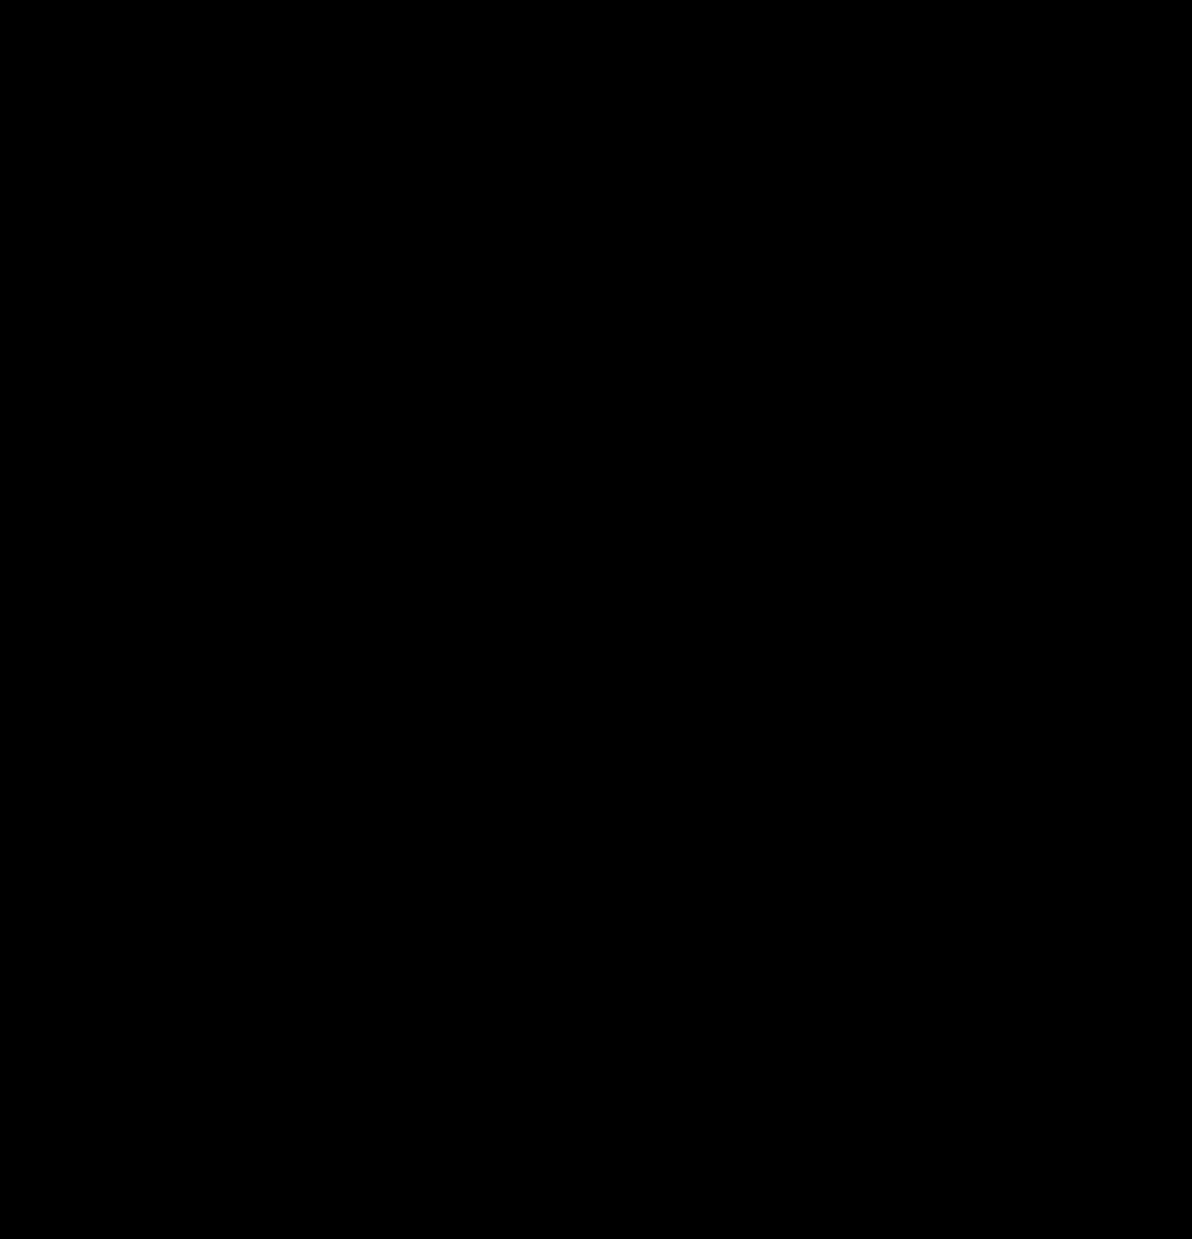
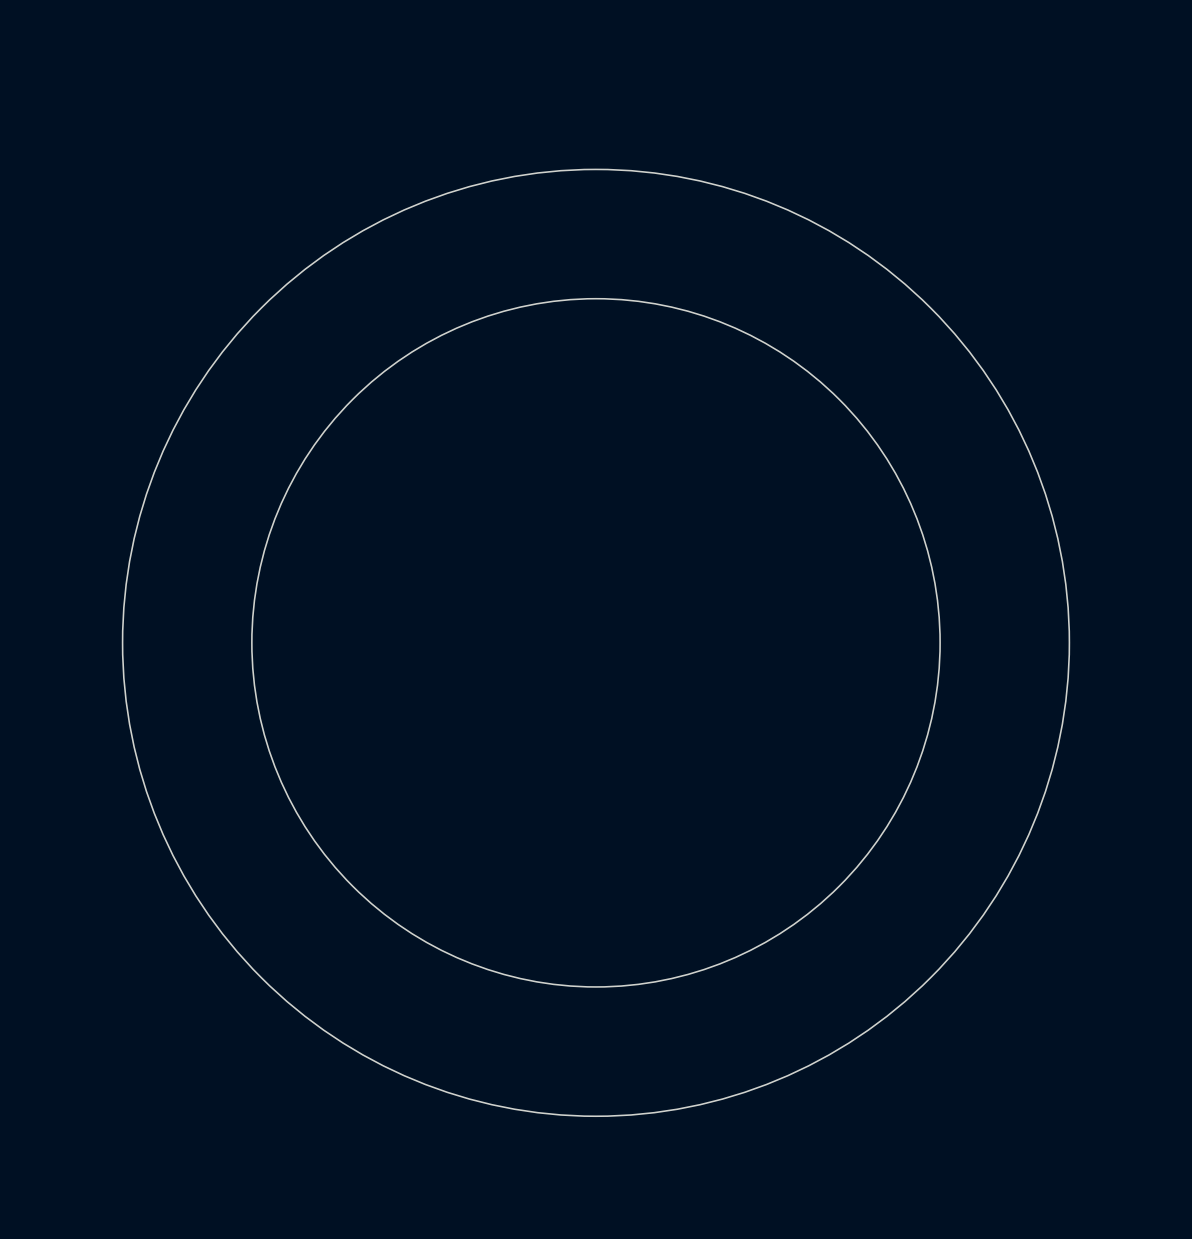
round board edge: none -> [121, 168, 1071, 1118]
round board edge: none -> [251, 297, 941, 988]

